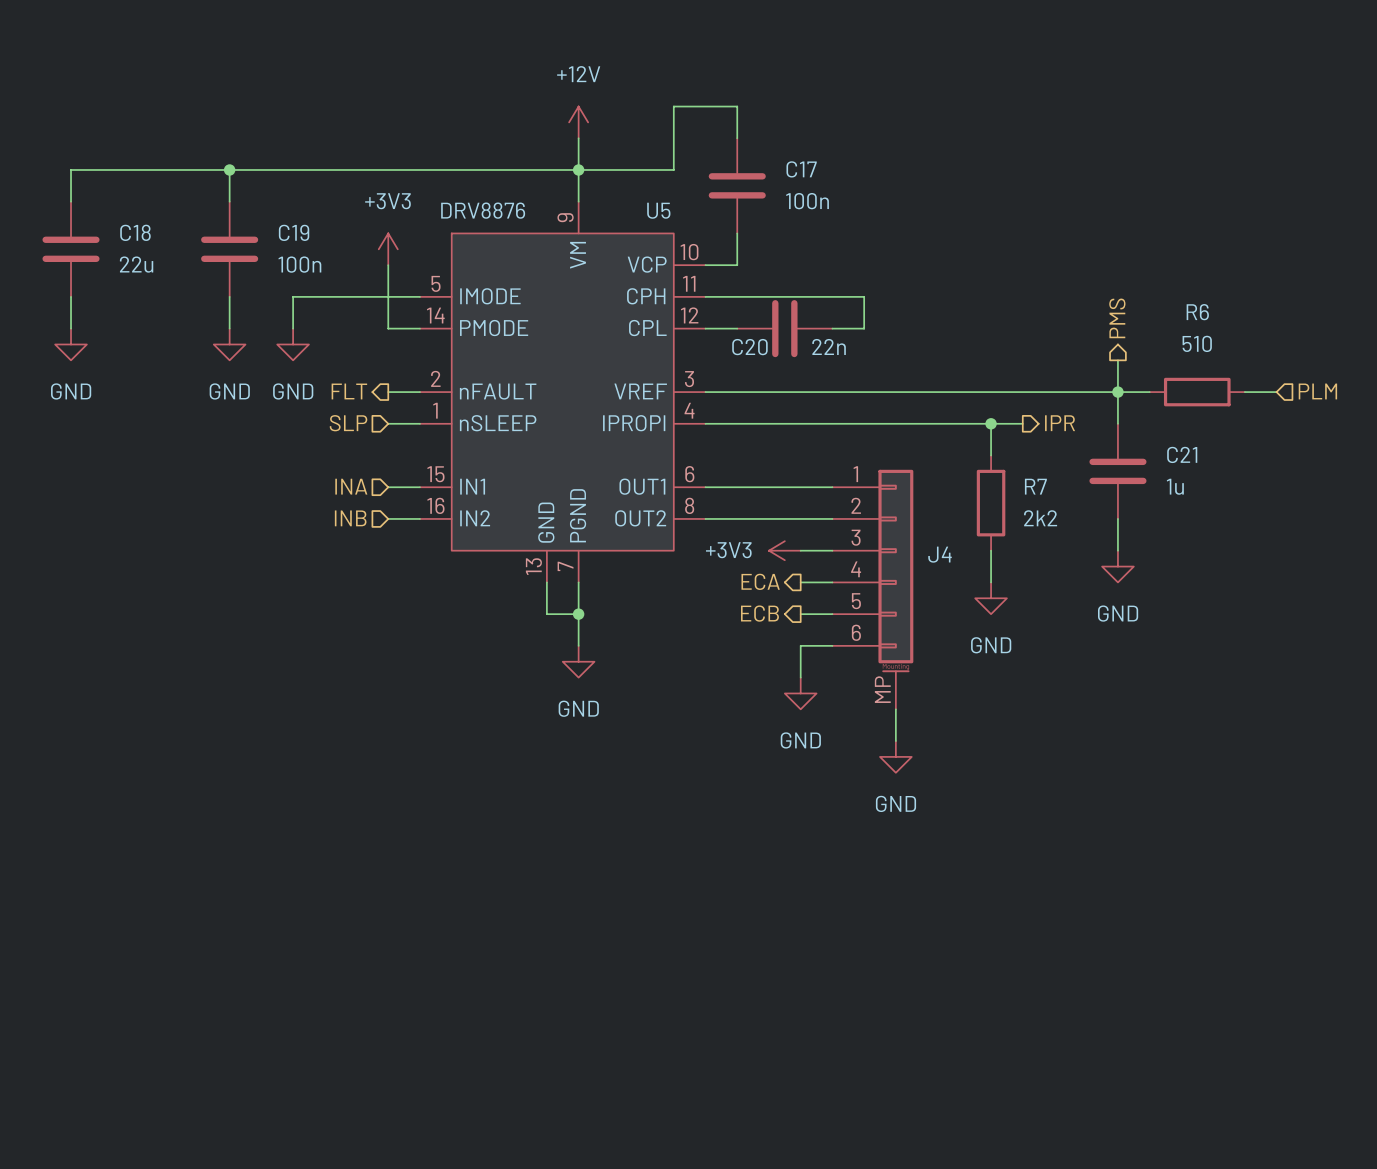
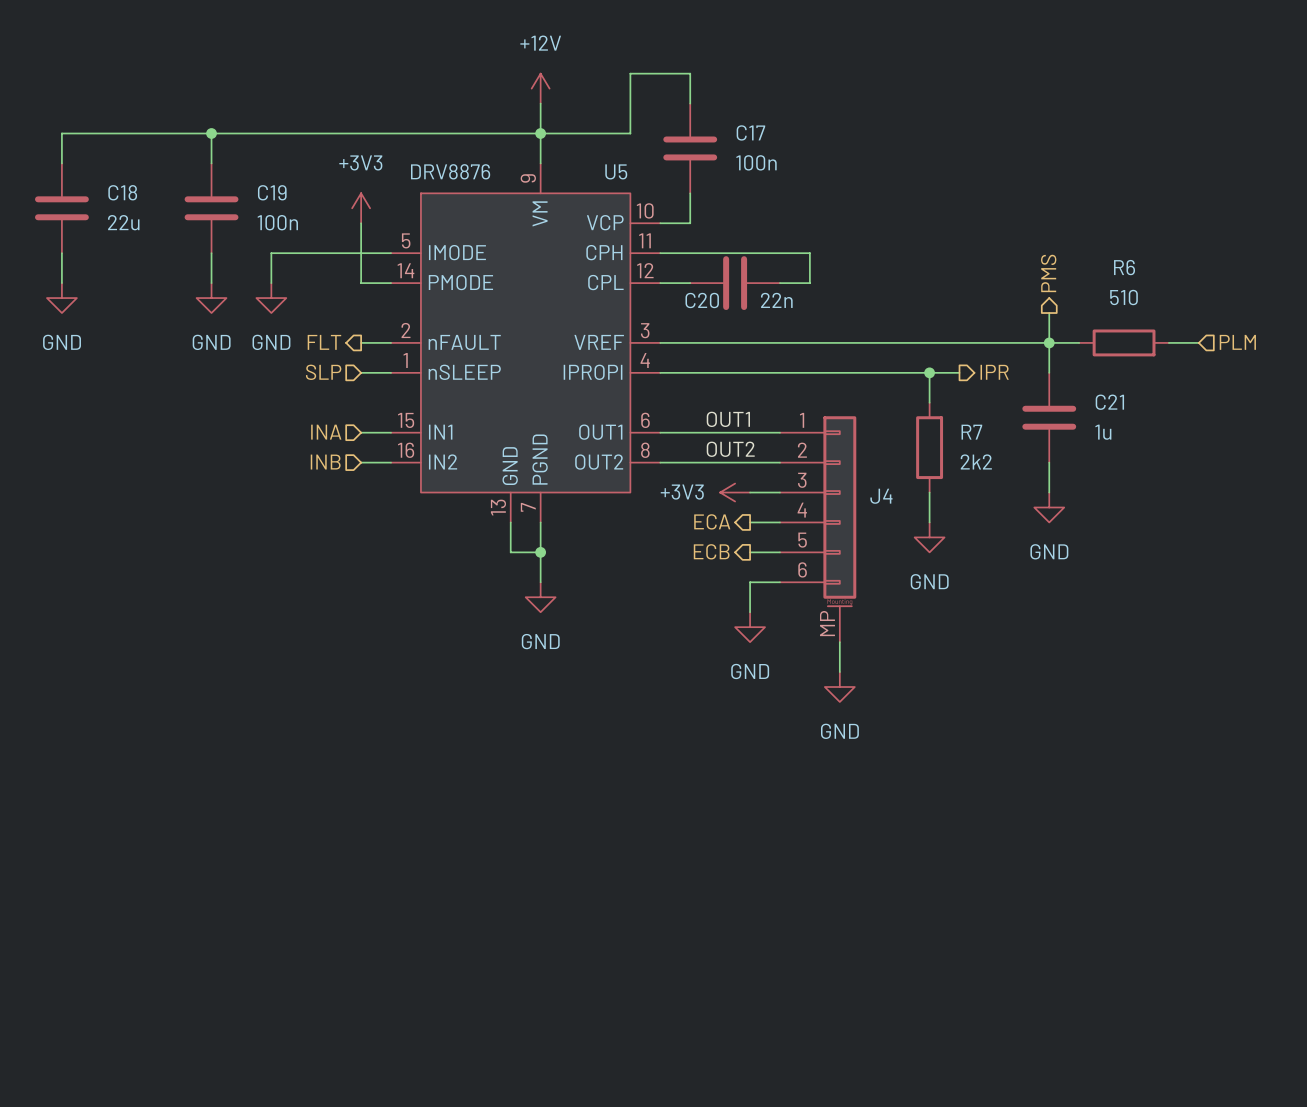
label: none -> OUT1 (728, 419)
label: none -> OUT2 (730, 449)

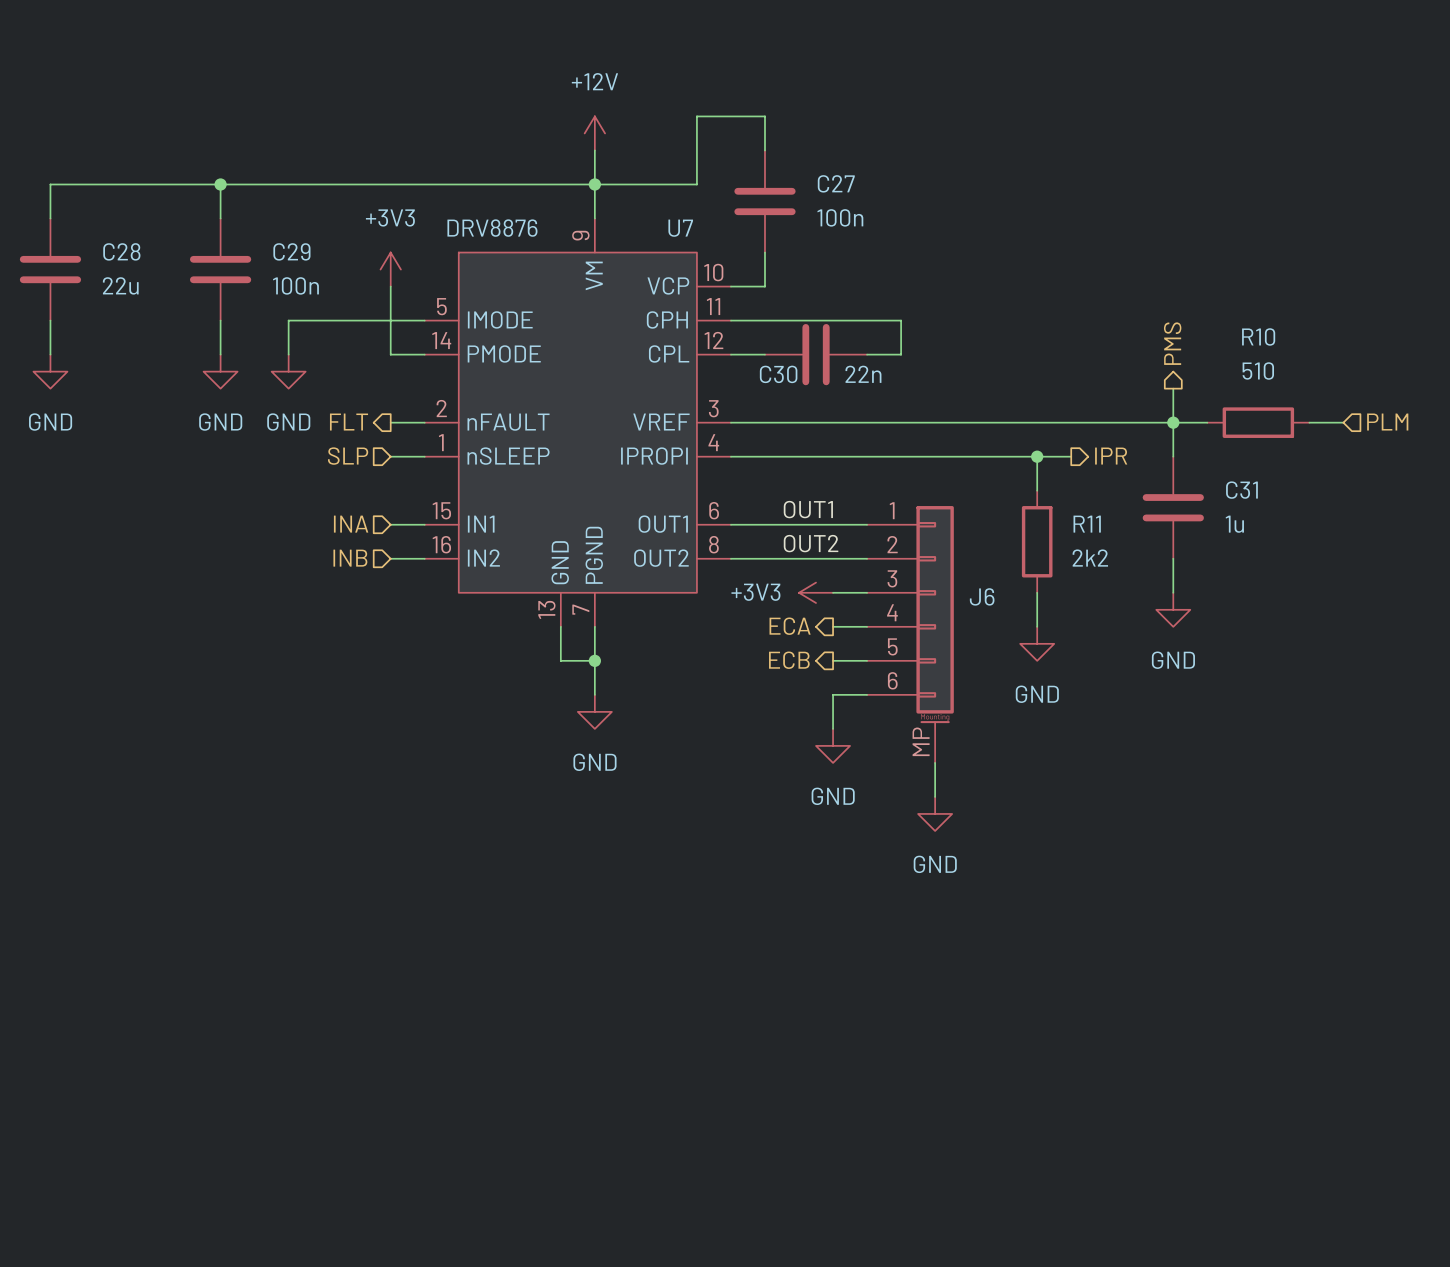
C17 name: C17 (750, 132) -> C27 (836, 183)
U5 name: U5 (616, 171) -> U7 (680, 228)
C18 name: C18 (122, 192) -> C28 (121, 251)
C19 name: C19 (272, 192) -> C29 (291, 251)
R6 name: R6 (1124, 267) -> R10 (1258, 336)
C20 name: C20 (702, 300) -> C30 (778, 374)
C21 name: C21 (1109, 402) -> C31 (1241, 490)
R7 name: R7 (971, 432) -> R11 (1087, 524)
J4 name: J4 (881, 496) -> J6 (982, 596)

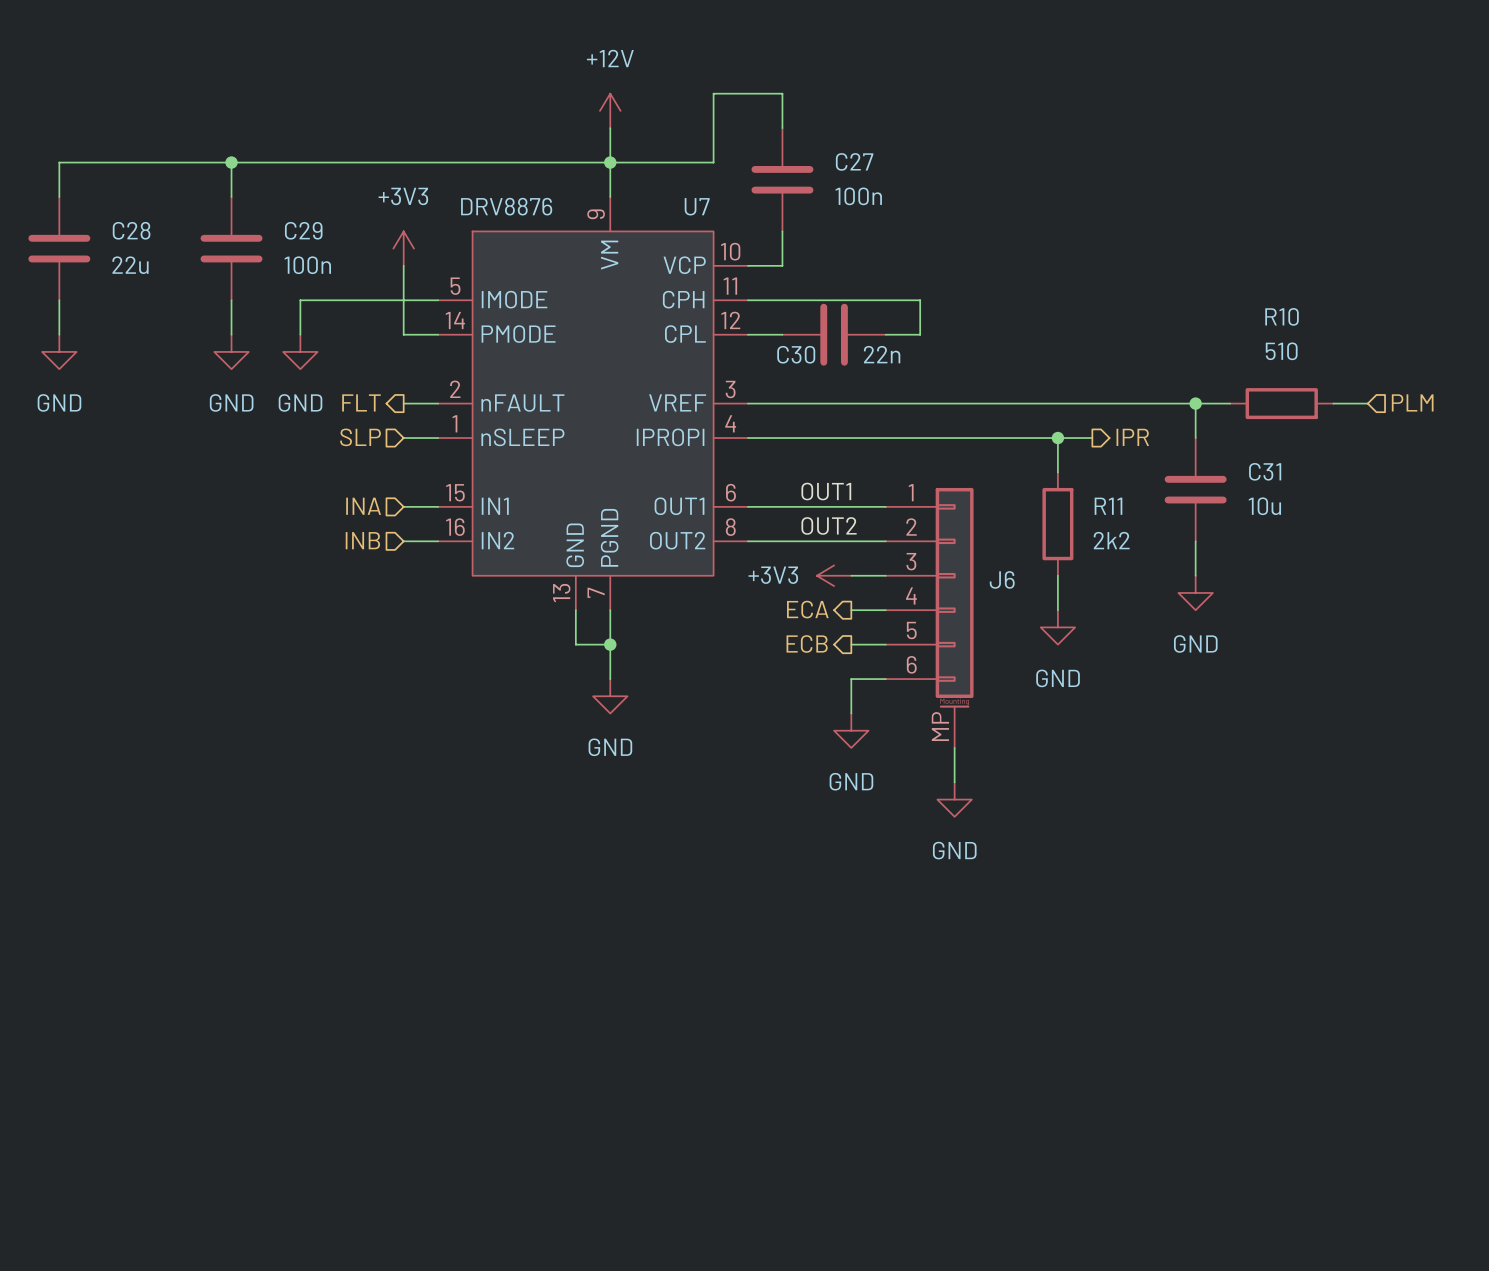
hierarchical label: PMS (1172, 343) -> none
wire: (1173, 388) (1173, 422) -> none
C31 value: 1u (1234, 524) -> 10u (1264, 506)

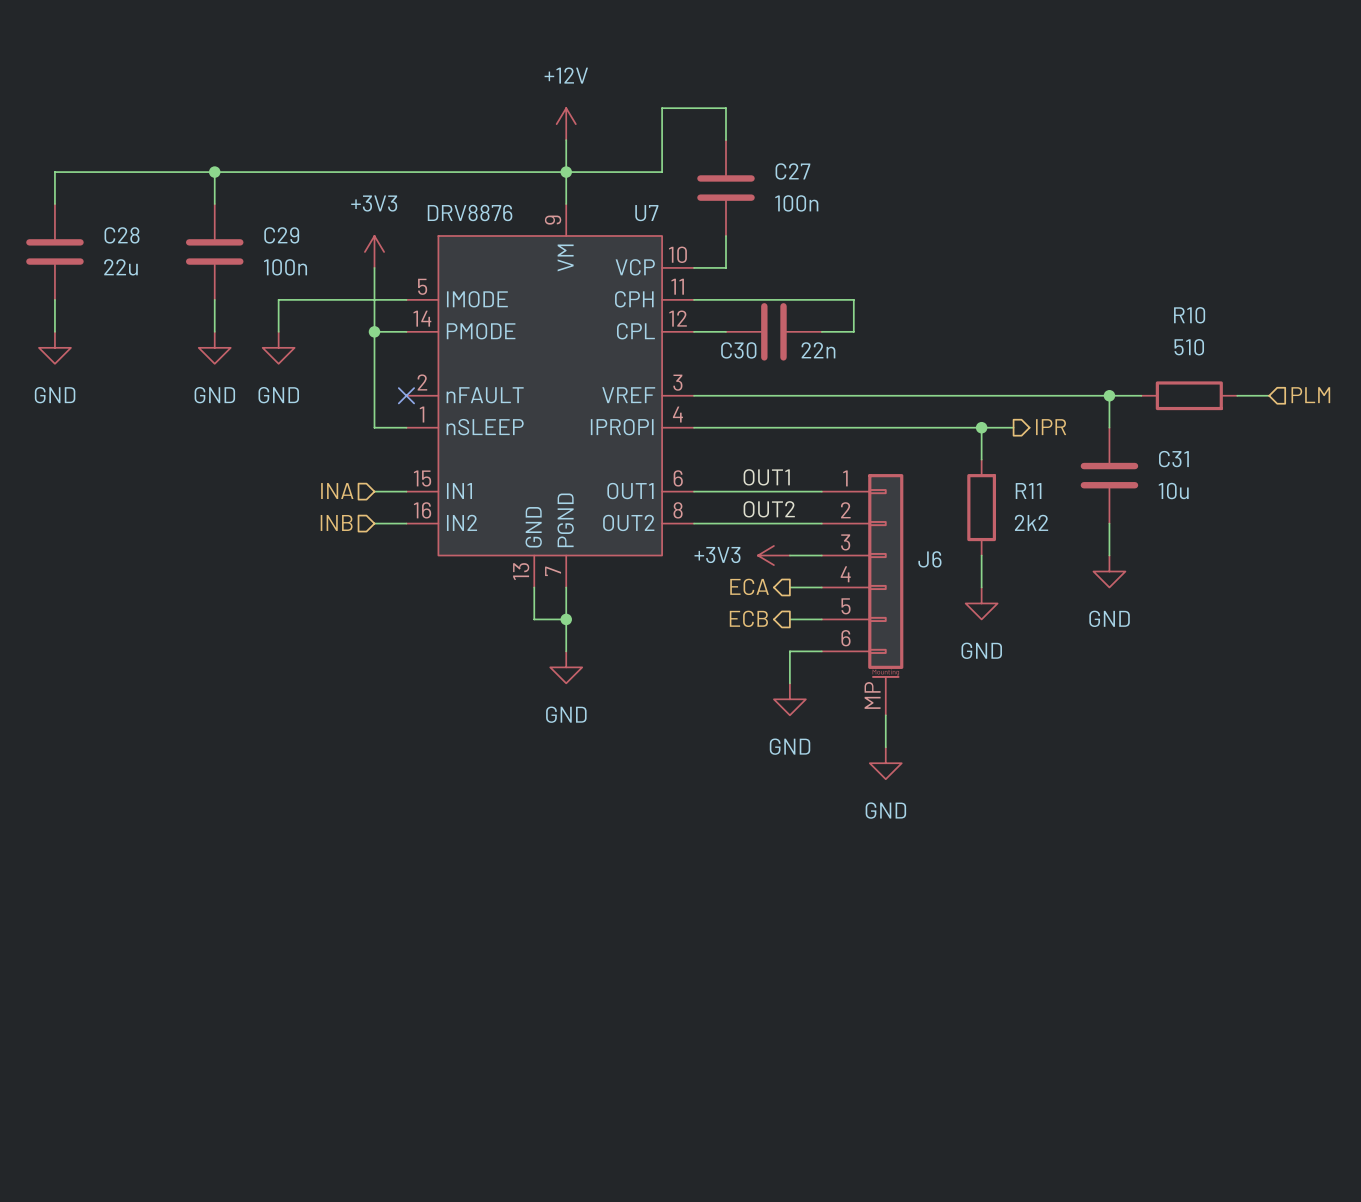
wire: none -> (374, 331) (374, 427)
junction: none -> (374, 331)
hierarchical label: FLT (361, 402) -> none
wire: (403, 403) (438, 403) -> none
no-connect mark: none -> (406, 395)
hierarchical label: SLP (360, 437) -> none

